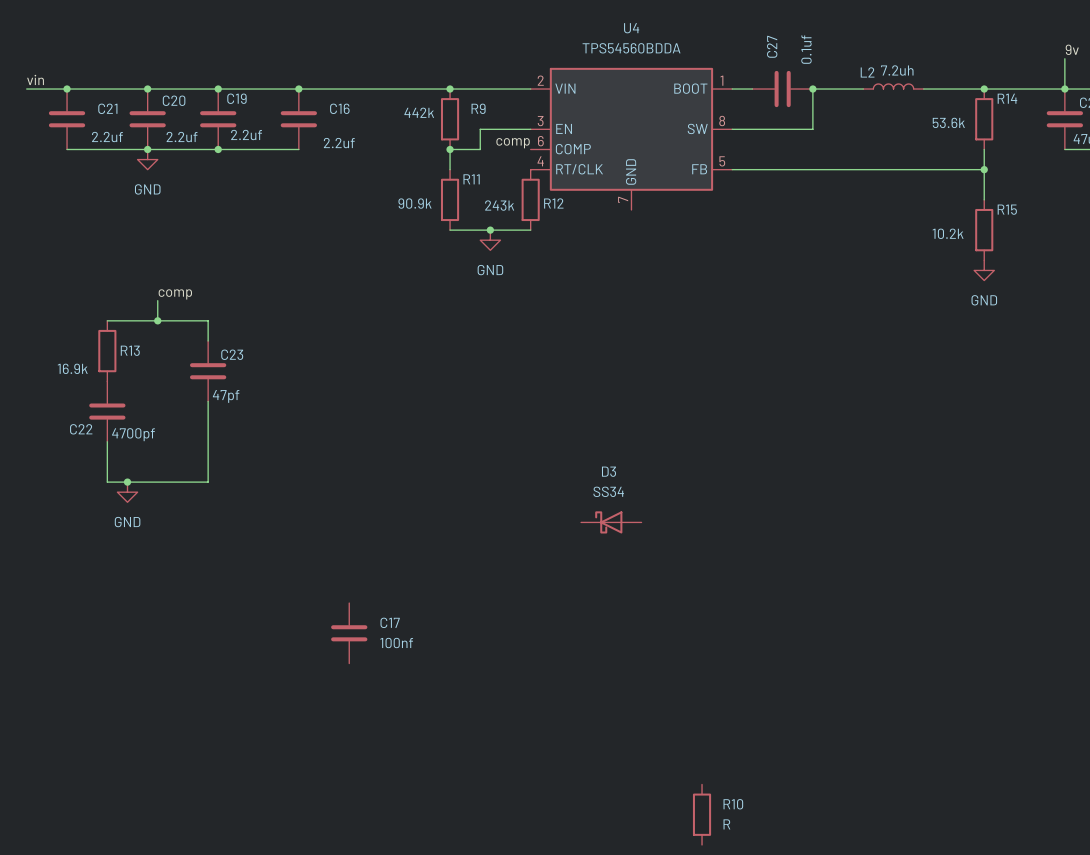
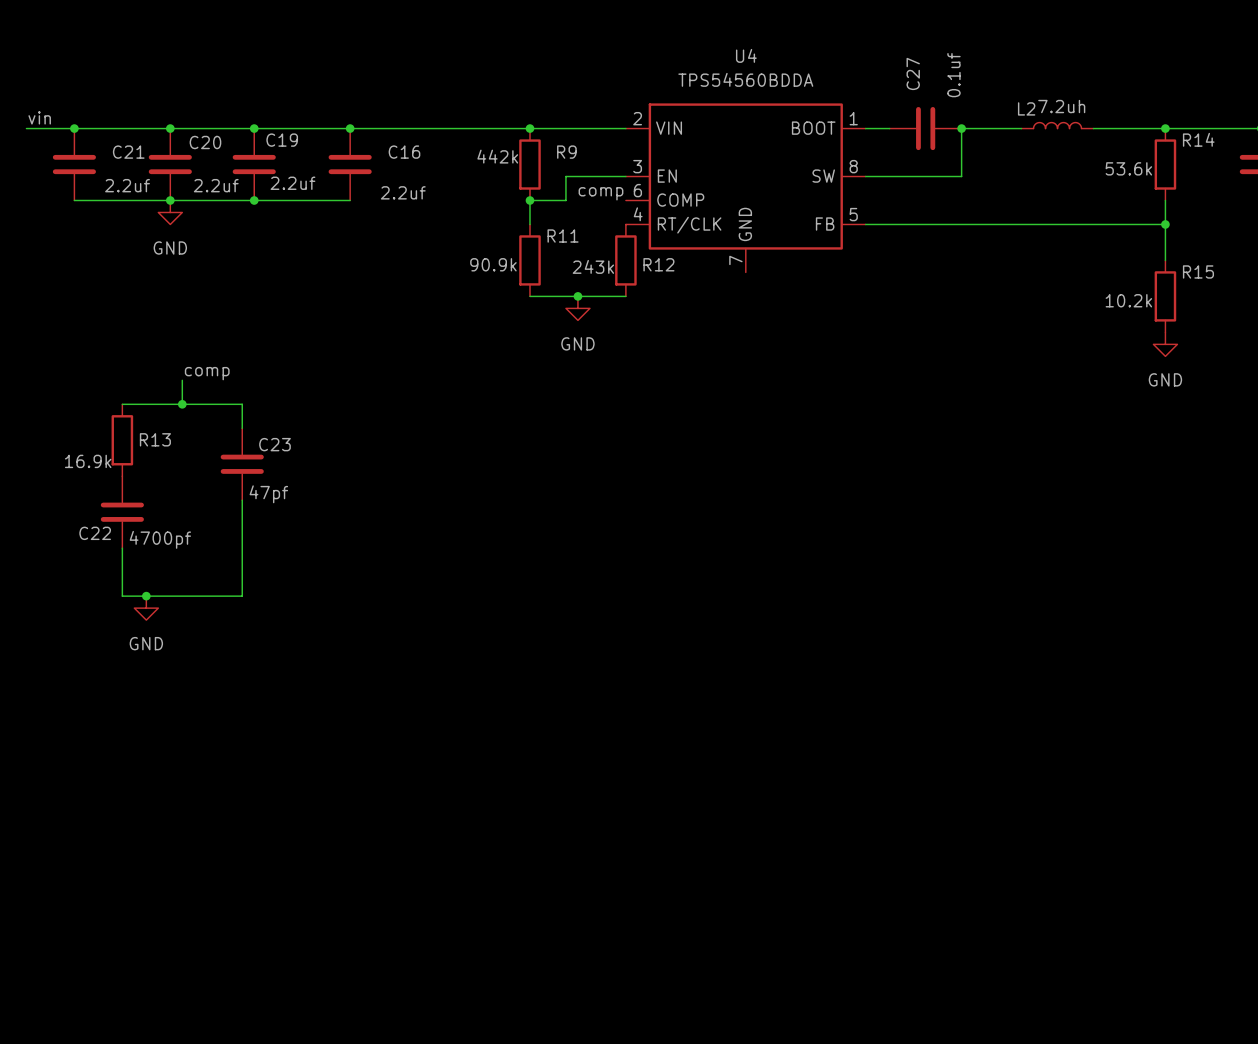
D3: SS34 (611, 522) -> none
C17: 100nf (349, 633) -> none
R10: R (702, 814) -> none

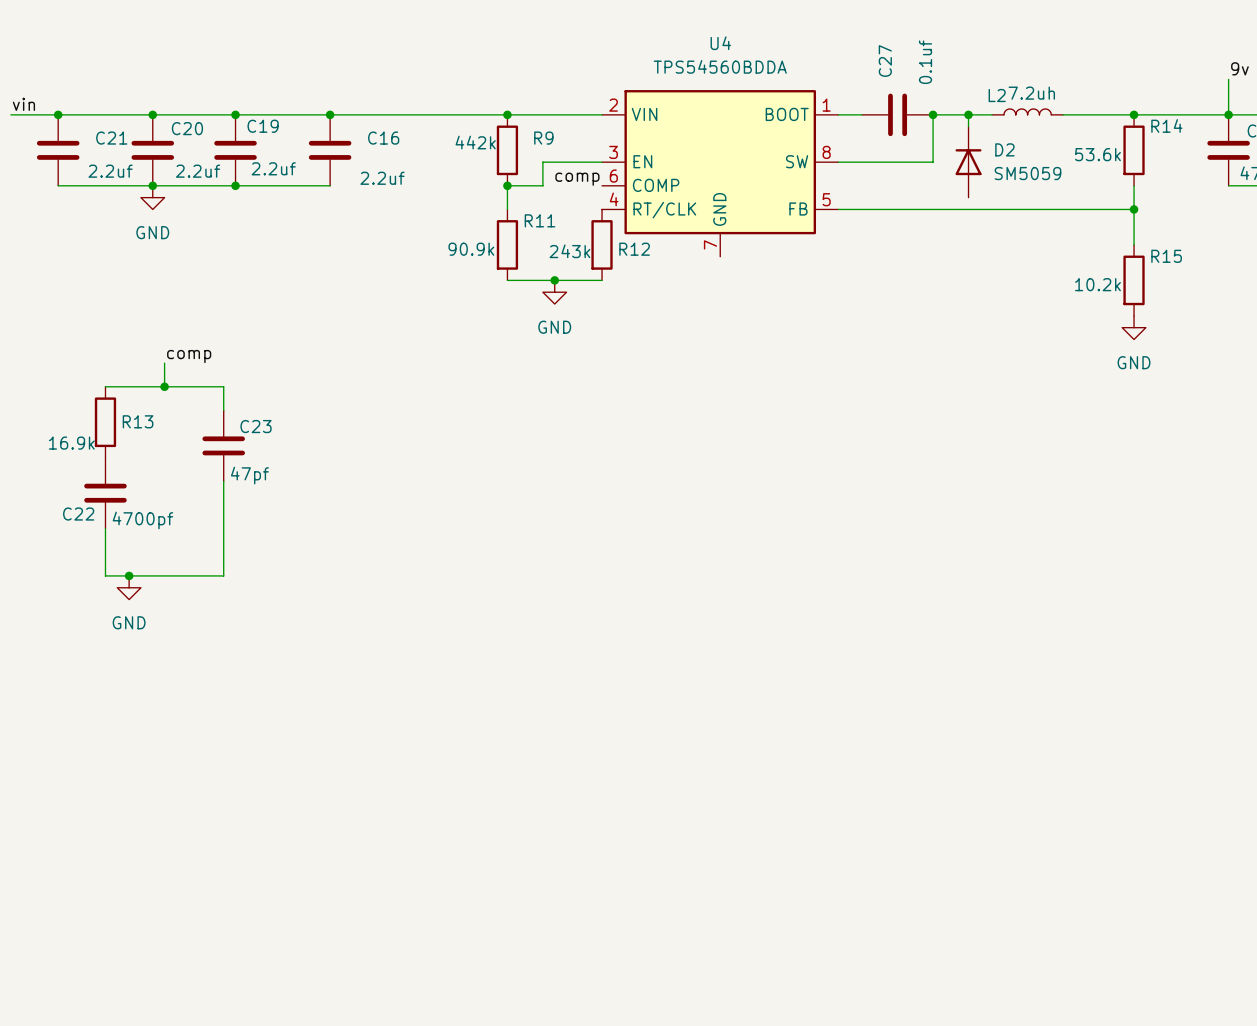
wire: none -> (968, 114) (968, 126)
junction: none -> (968, 114)
D2: none -> SM5059 (968, 162)

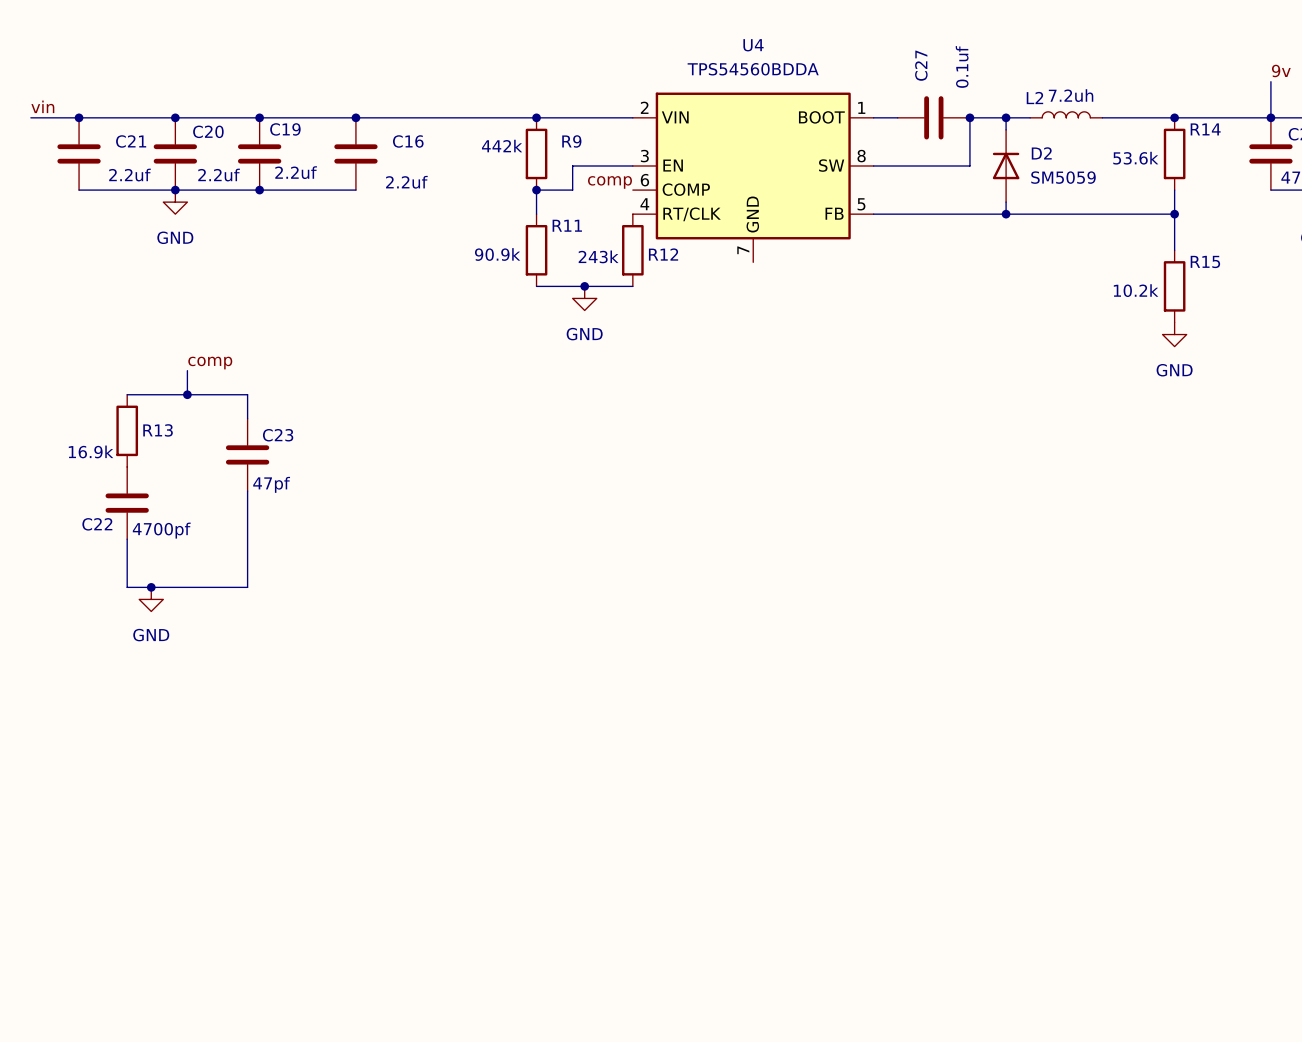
wire: none -> (1006, 202) (1006, 214)
junction: none -> (1006, 214)

